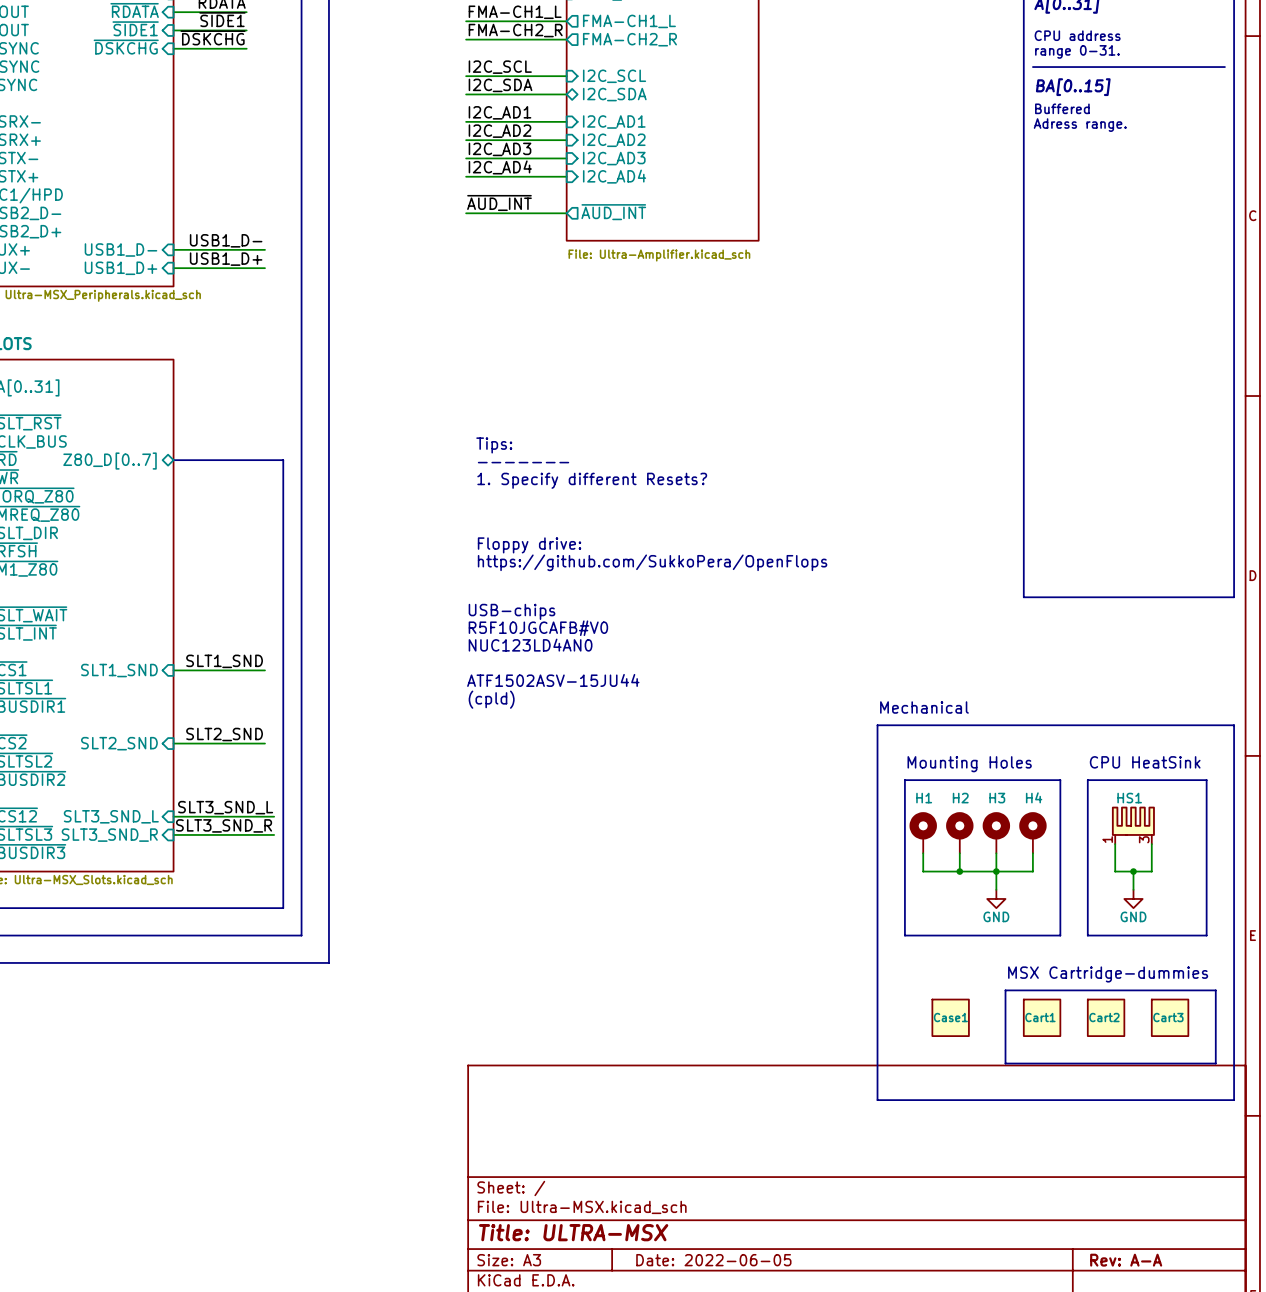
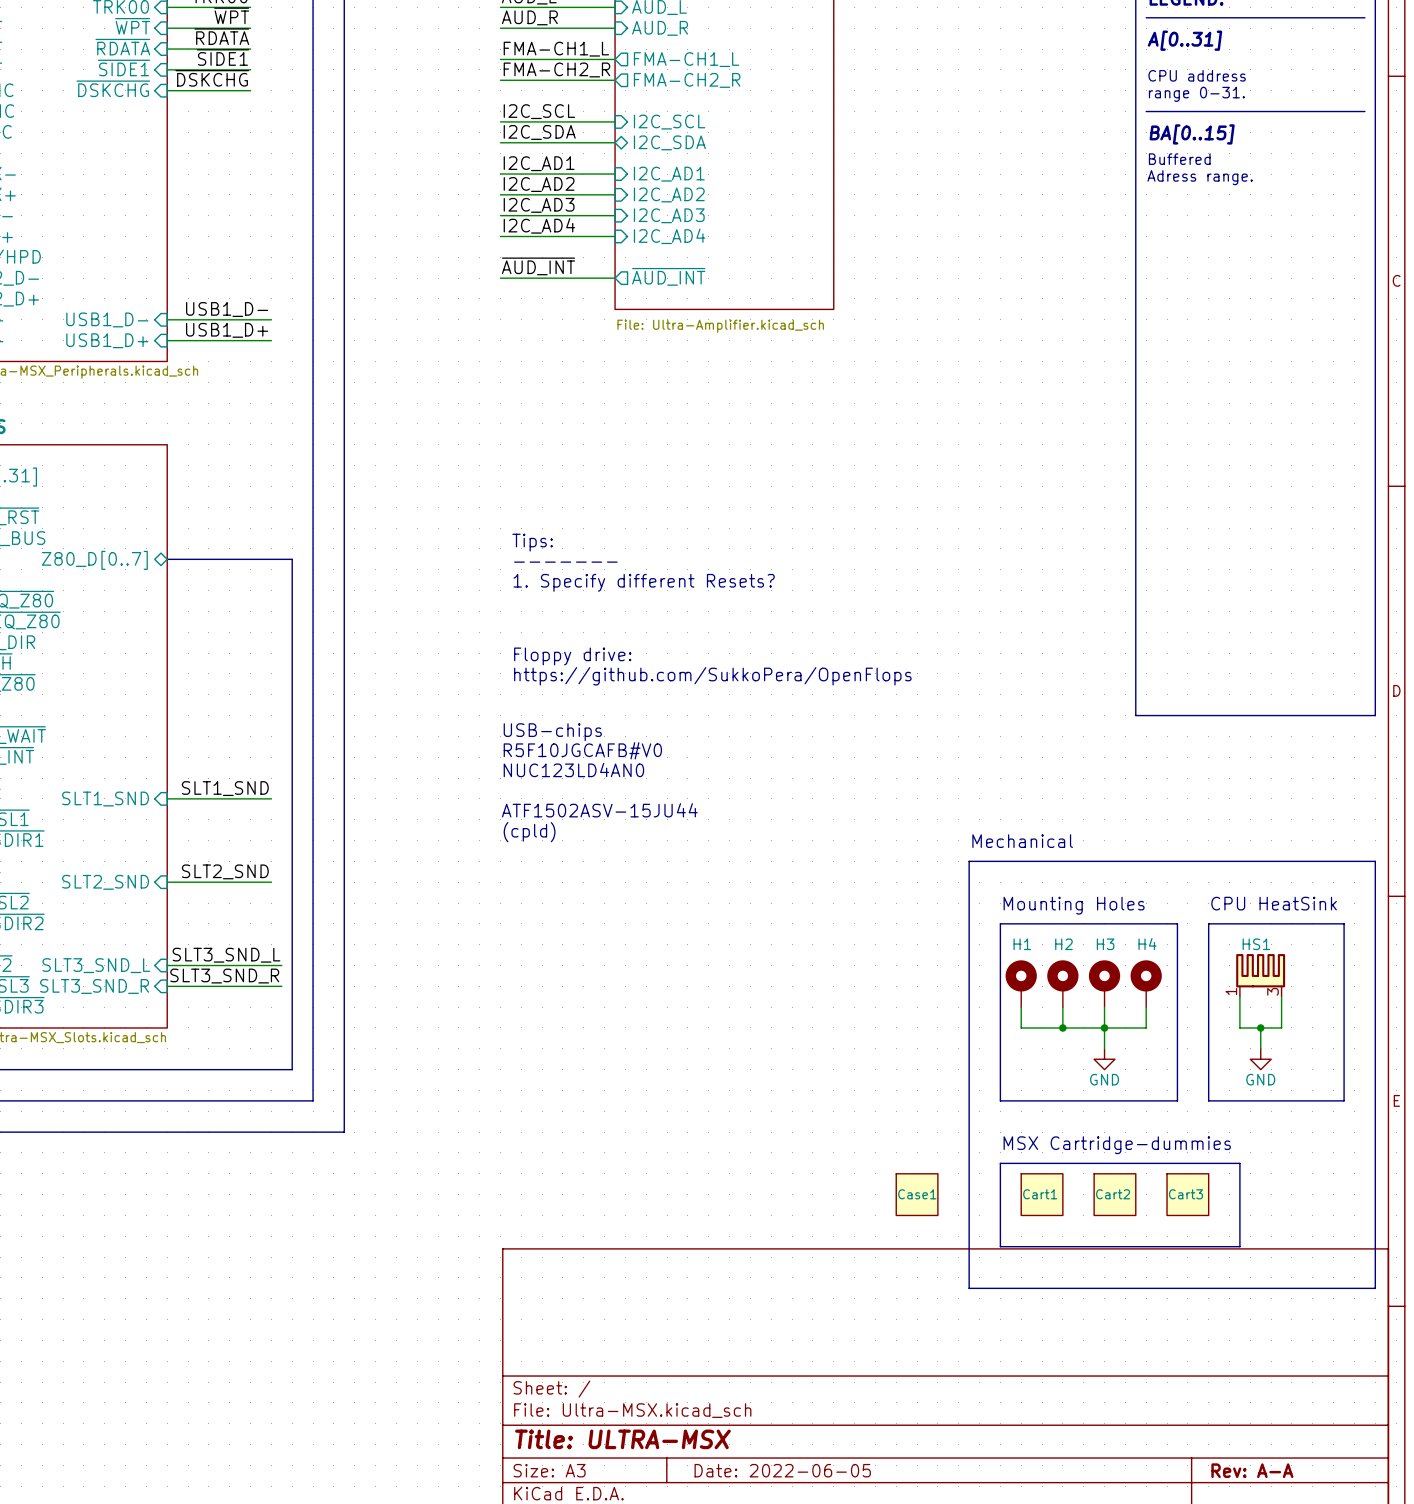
text position: MSX Cartridge-dummies (1108, 974) -> MSX Cartridge-dummies (1117, 1145)
line: (1005, 990) (1005, 1063) -> (1114, 1163) (1000, 1163) (1000, 1246) (1114, 1246)
line: (1115, 990) (1215, 990) (1215, 1063) (1115, 1063) -> (1239, 1163) (1239, 1246)
Case1 position: (950, 1017) -> (917, 1194)
Cart1 position: (1042, 1017) -> (1042, 1194)
Cart2 position: (1106, 1017) -> (1114, 1194)
Cart3 position: (1170, 1017) -> (1187, 1194)

